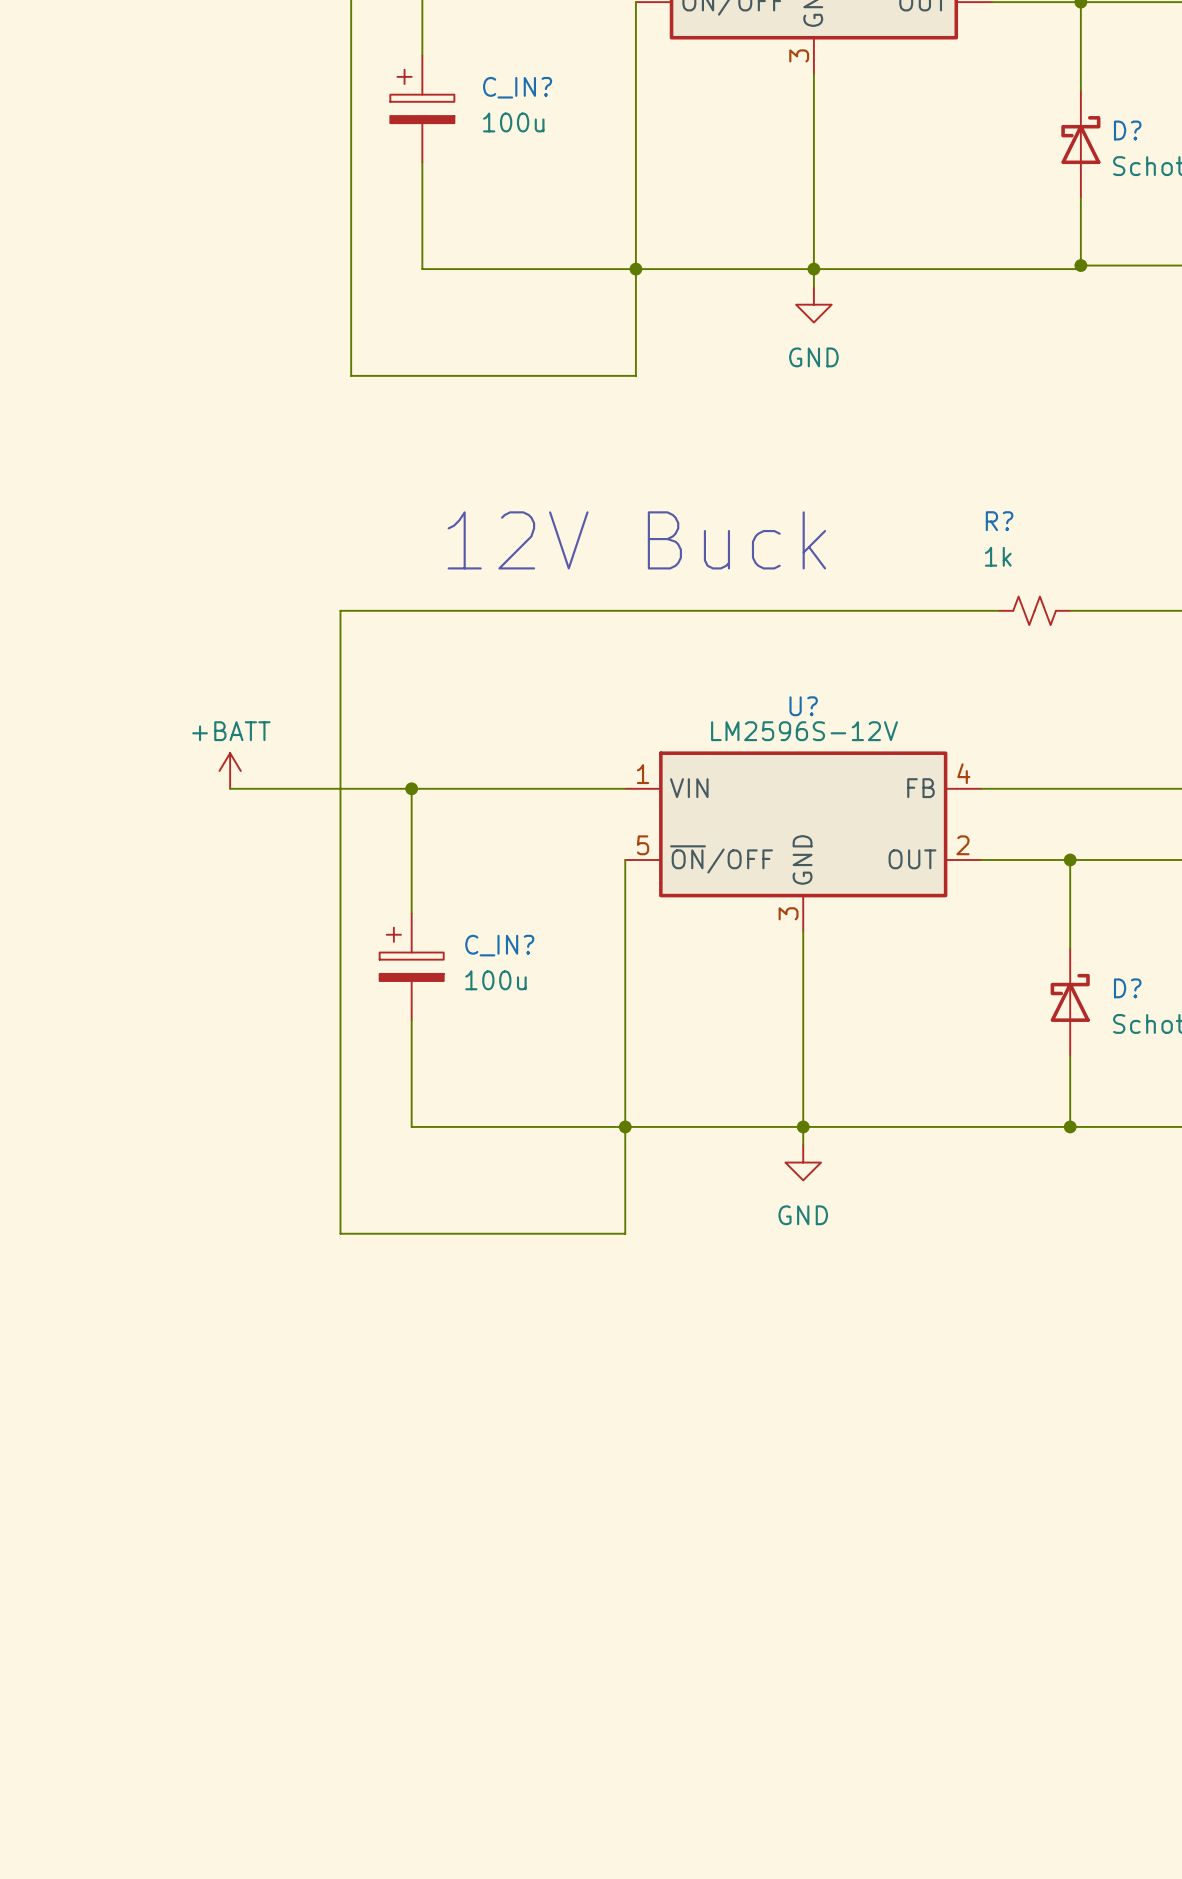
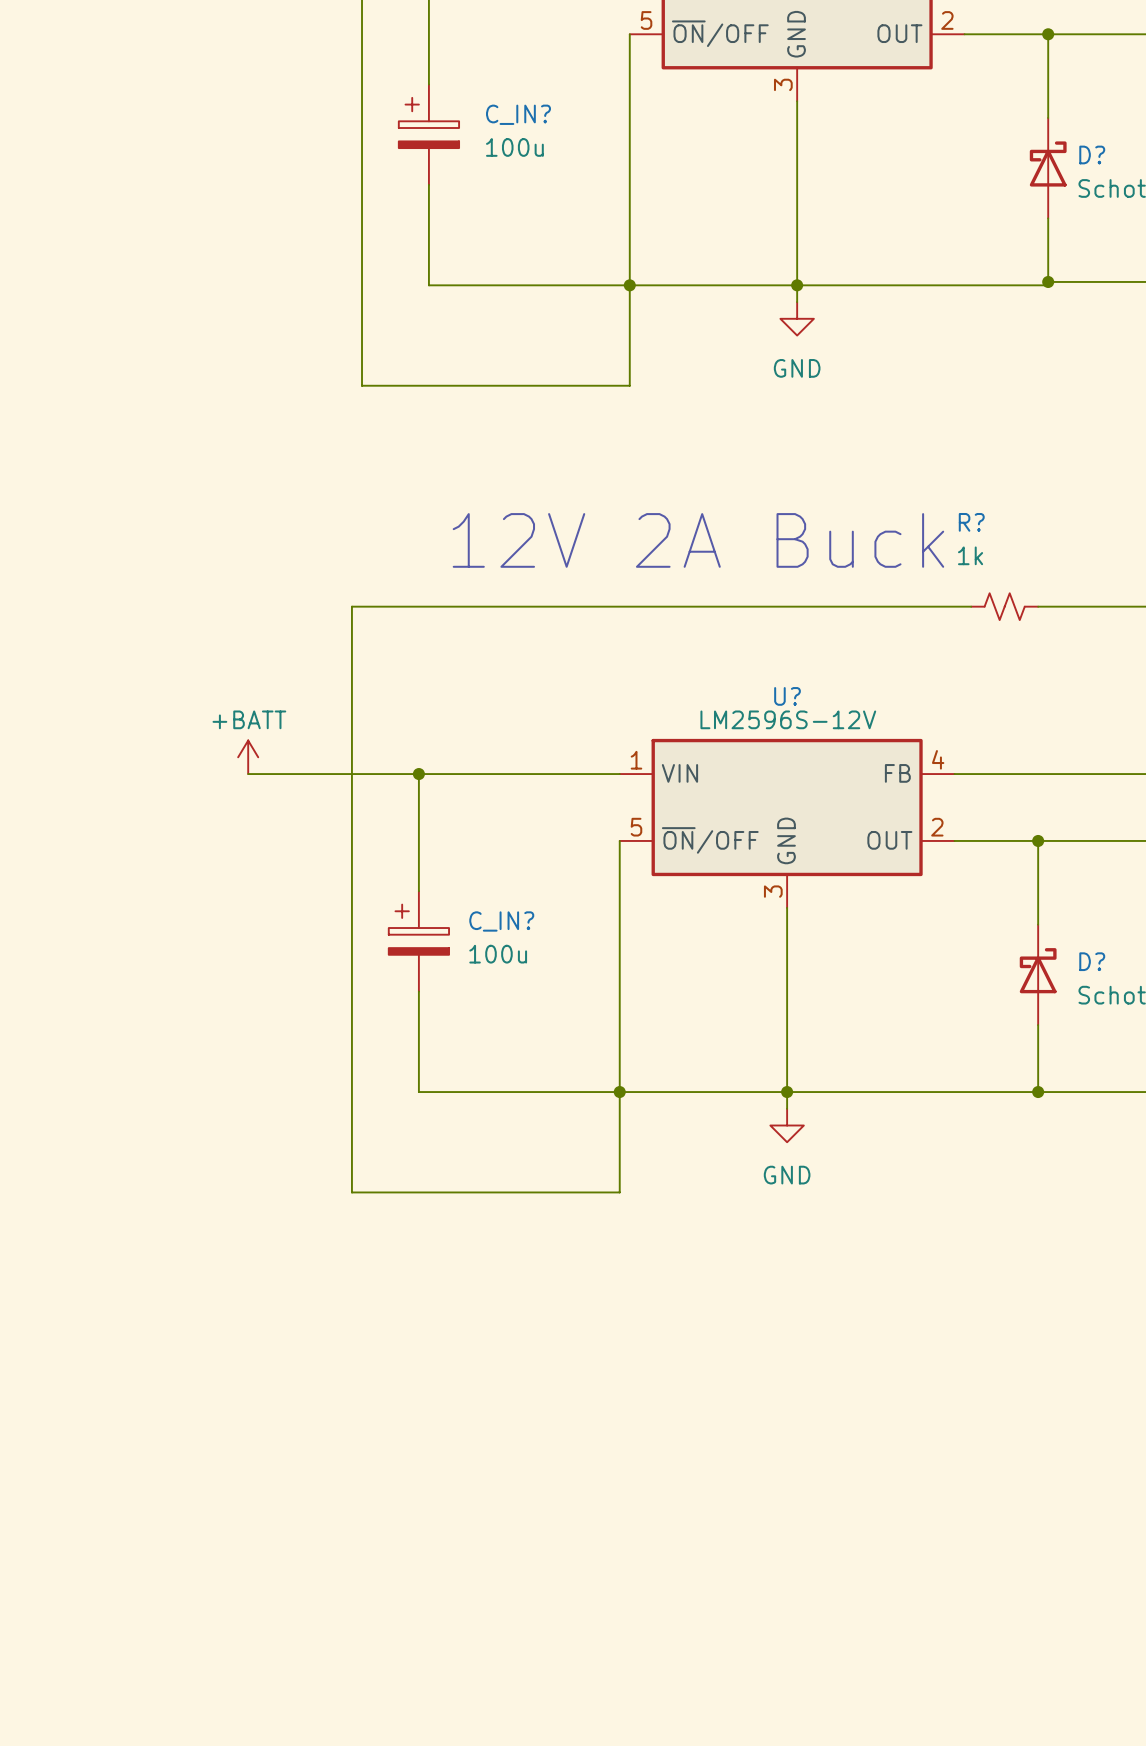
text: 12V Buck (636, 540) -> 12V 2A Buck (698, 540)

